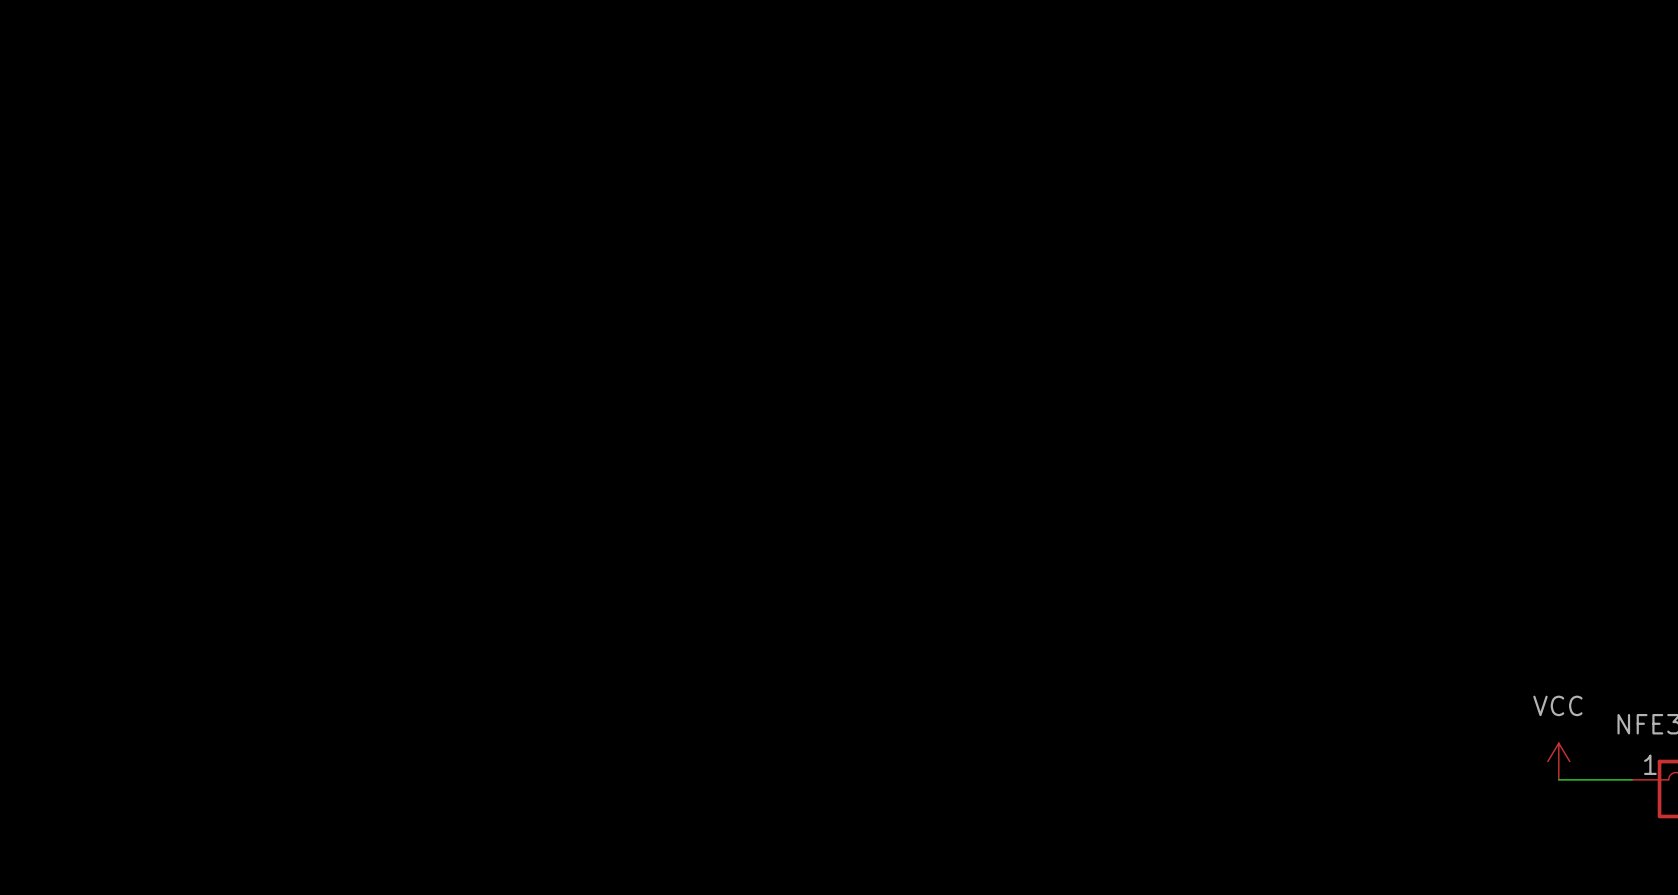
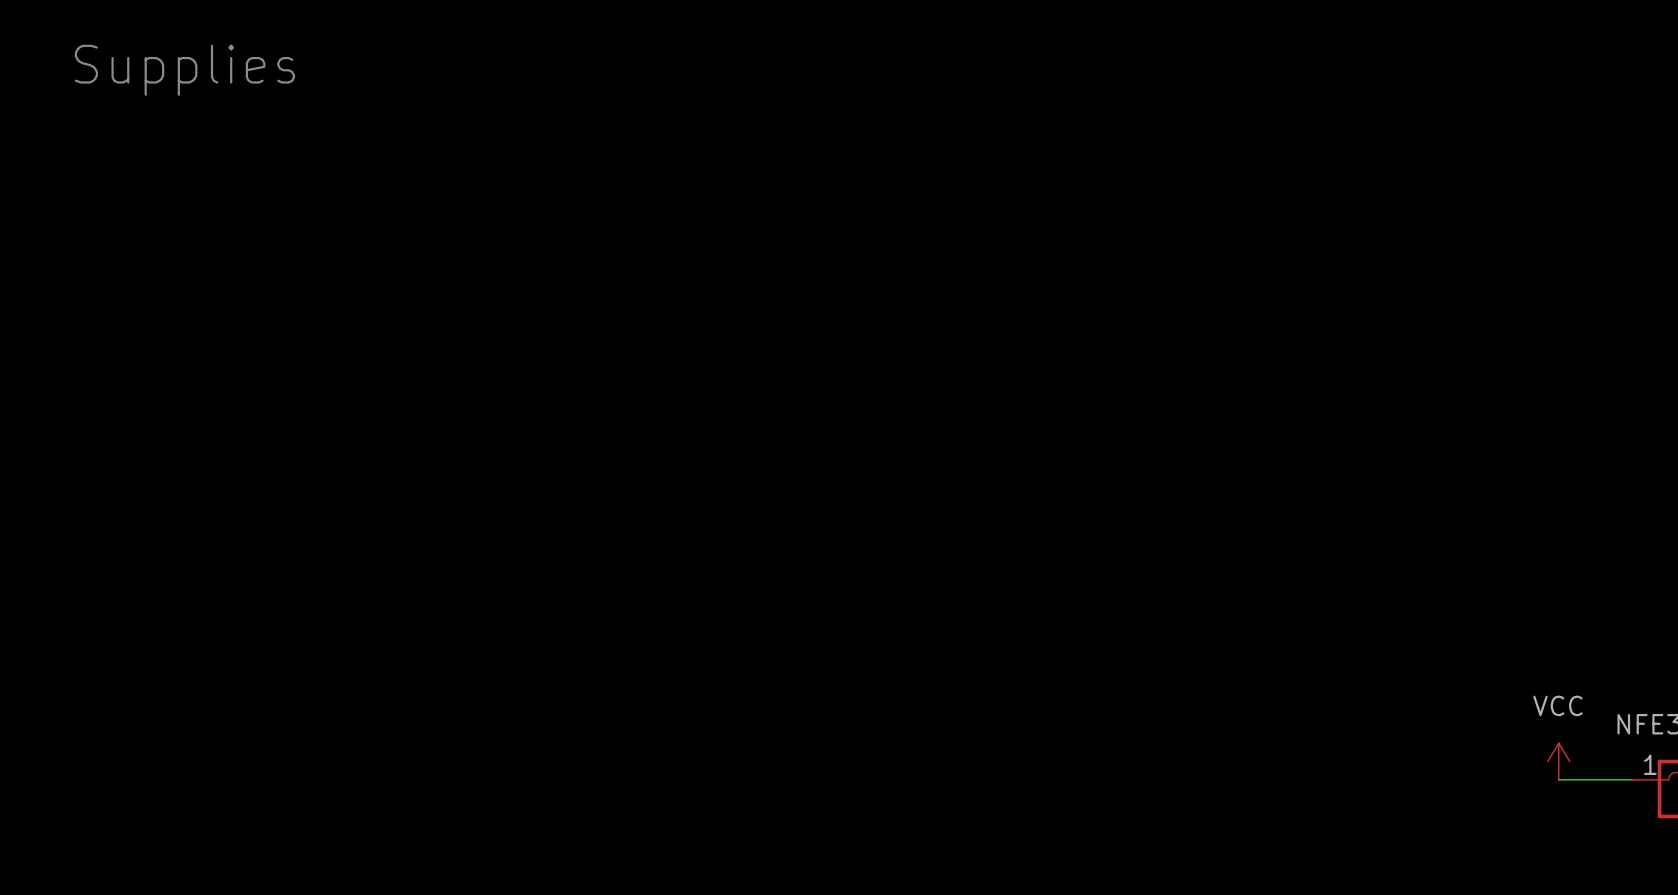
text: none -> Supplies (184, 70)

